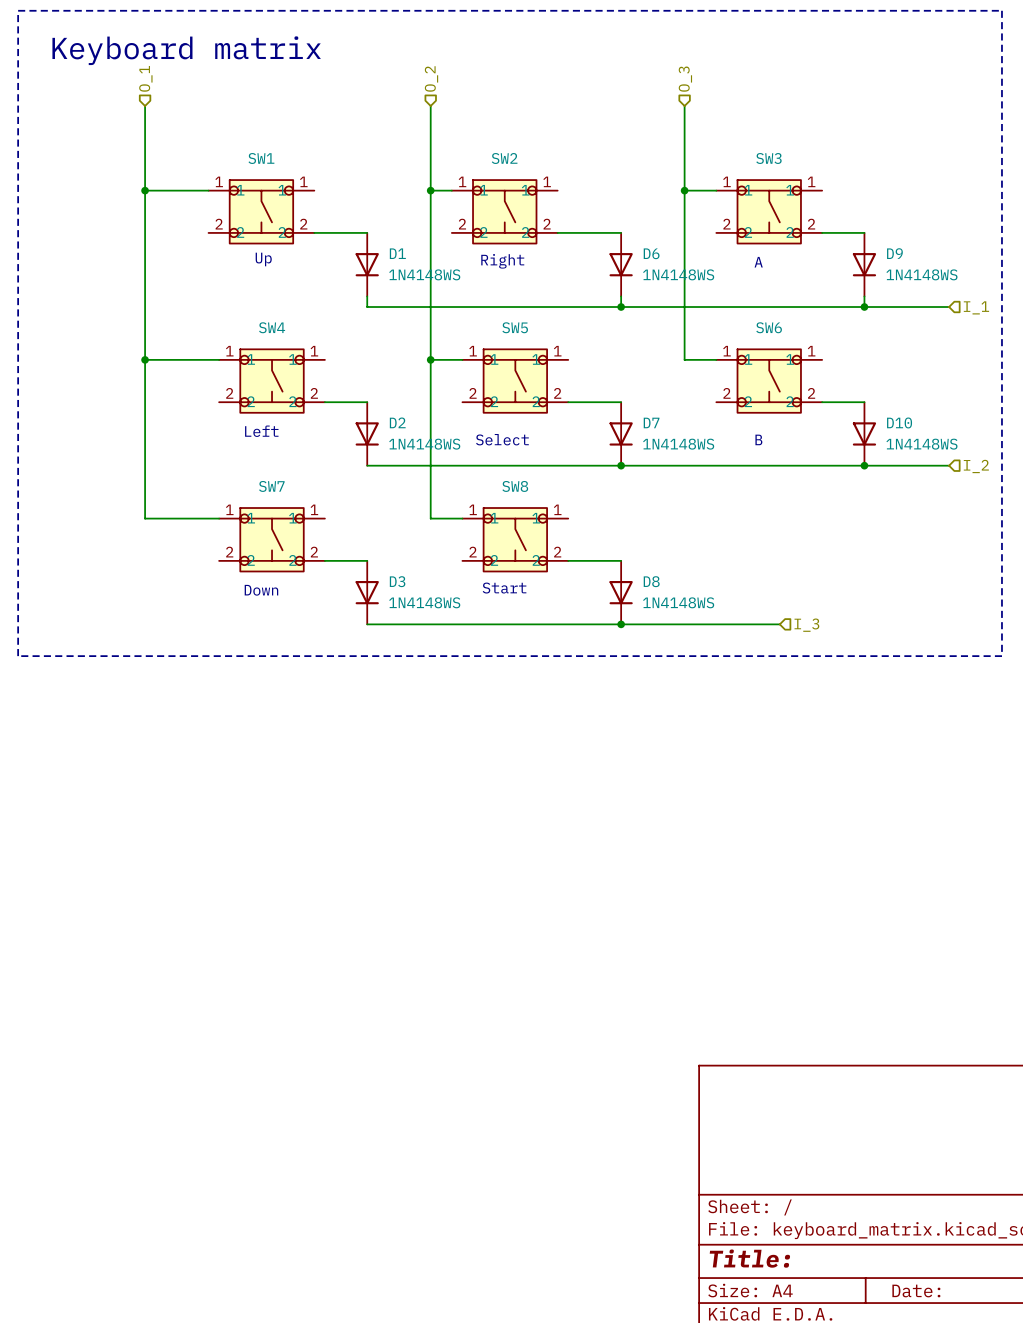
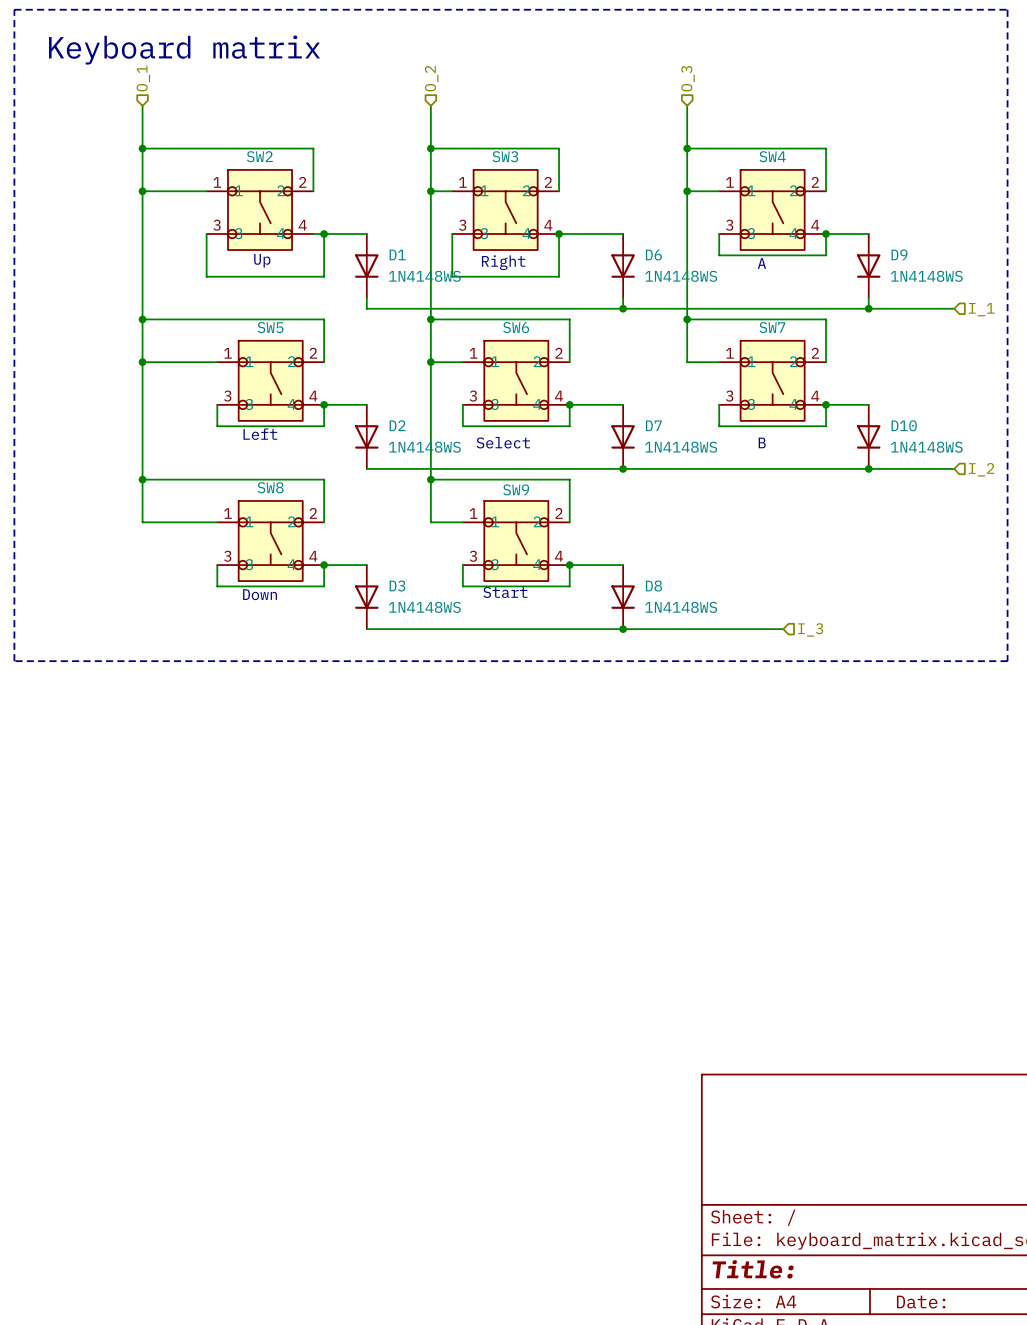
wire: none -> (142, 148) (313, 148) (313, 191)
junction: none -> (142, 148)
wire: none -> (430, 148) (559, 148) (559, 191)
junction: none -> (430, 148)
wire: none -> (687, 148) (826, 148) (826, 191)
junction: none -> (687, 148)
SW2 symbol: [451, 180, 558, 244] -> [206, 169, 314, 251]
SW3 symbol: [716, 180, 823, 244] -> [452, 169, 560, 251]
SW1: (261, 211) -> none
wire: none -> (206, 234) (206, 276) (324, 276) (324, 234)
junction: none -> (324, 234)
wire: none -> (452, 234) (452, 276) (559, 276) (559, 234)
junction: none -> (559, 234)
wire: none -> (719, 234) (719, 255) (826, 255) (826, 234)
junction: none -> (826, 234)
wire: none -> (142, 319) (324, 319) (324, 362)
junction: none -> (142, 319)
wire: none -> (430, 319) (569, 319) (569, 362)
junction: none -> (430, 319)
wire: none -> (687, 319) (826, 319) (826, 362)
junction: none -> (687, 319)
SW4 symbol: [219, 349, 325, 413] -> [719, 169, 827, 251]
SW5 symbol: [462, 349, 569, 413] -> [217, 340, 325, 421]
SW6 symbol: [716, 349, 823, 413] -> [462, 340, 570, 421]
wire: none -> (217, 404) (217, 426) (324, 426) (324, 404)
junction: none -> (324, 404)
wire: none -> (462, 404) (462, 426) (569, 426) (569, 404)
junction: none -> (569, 404)
wire: none -> (719, 404) (719, 426) (826, 426) (826, 404)
junction: none -> (826, 404)
wire: none -> (142, 479) (324, 479) (324, 522)
junction: none -> (142, 479)
wire: none -> (430, 479) (569, 479) (569, 522)
junction: none -> (430, 479)
SW7 symbol: [219, 508, 325, 572] -> [719, 340, 827, 421]
SW8 symbol: [462, 508, 569, 572] -> [217, 500, 325, 582]
SW9: none -> (516, 541)
wire: none -> (217, 565) (217, 586) (324, 586) (324, 565)
junction: none -> (324, 565)
wire: none -> (462, 565) (462, 586) (569, 586) (569, 565)
junction: none -> (569, 565)

